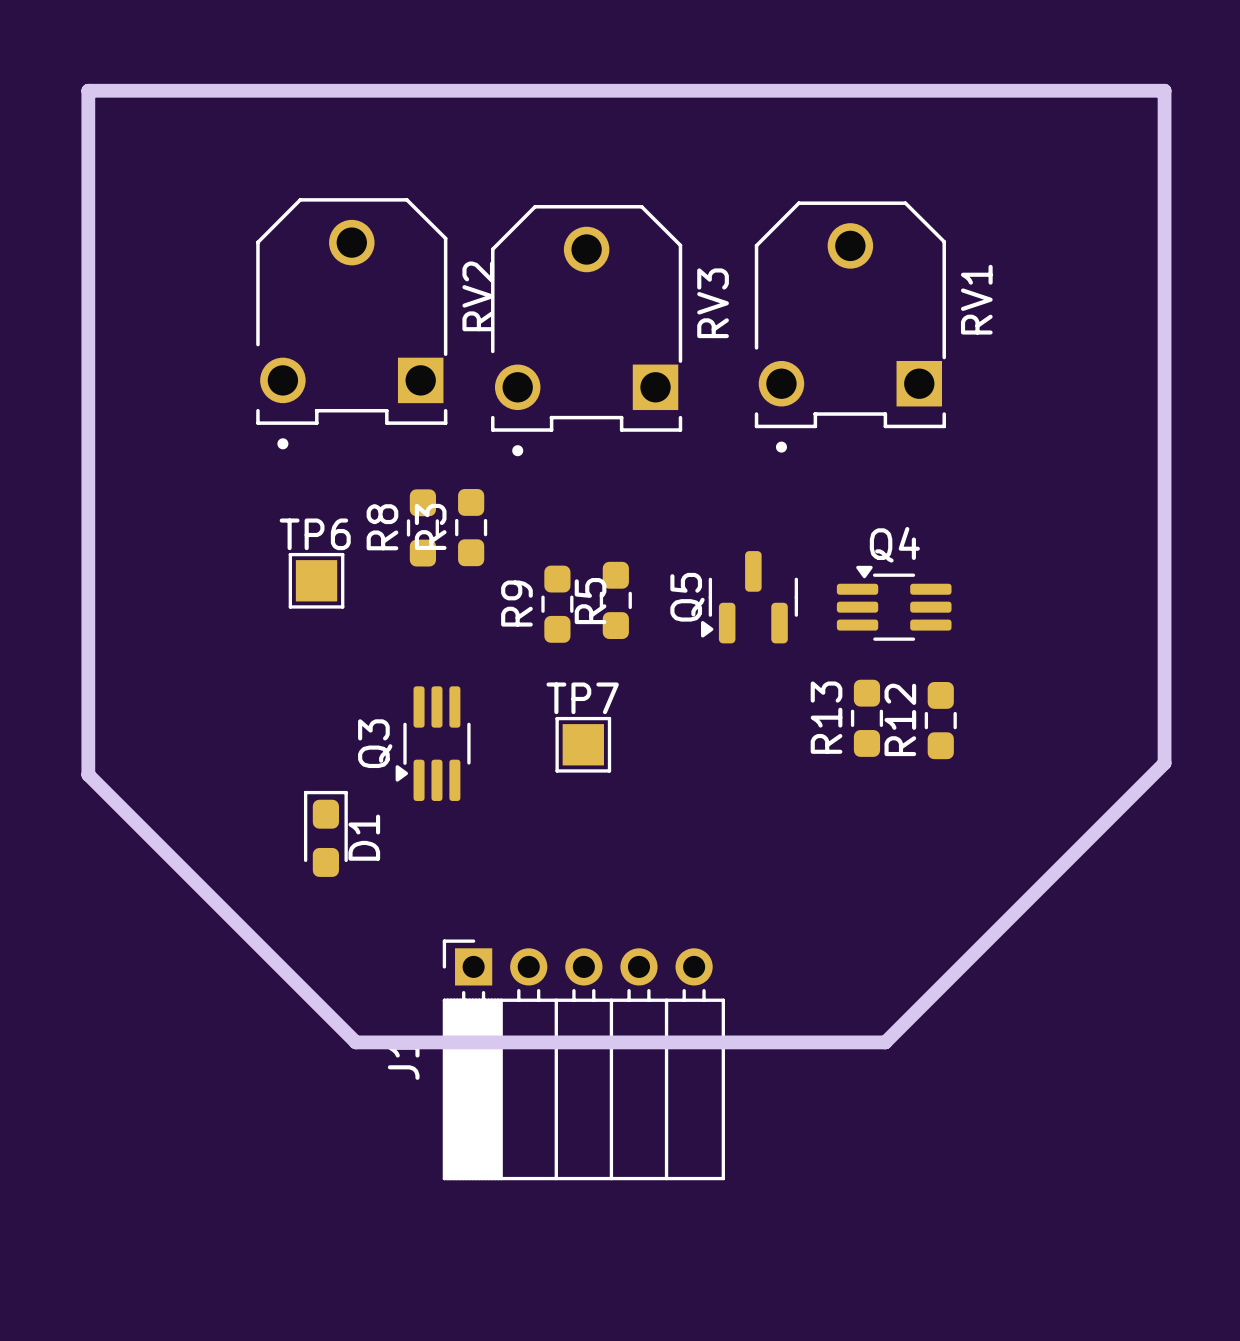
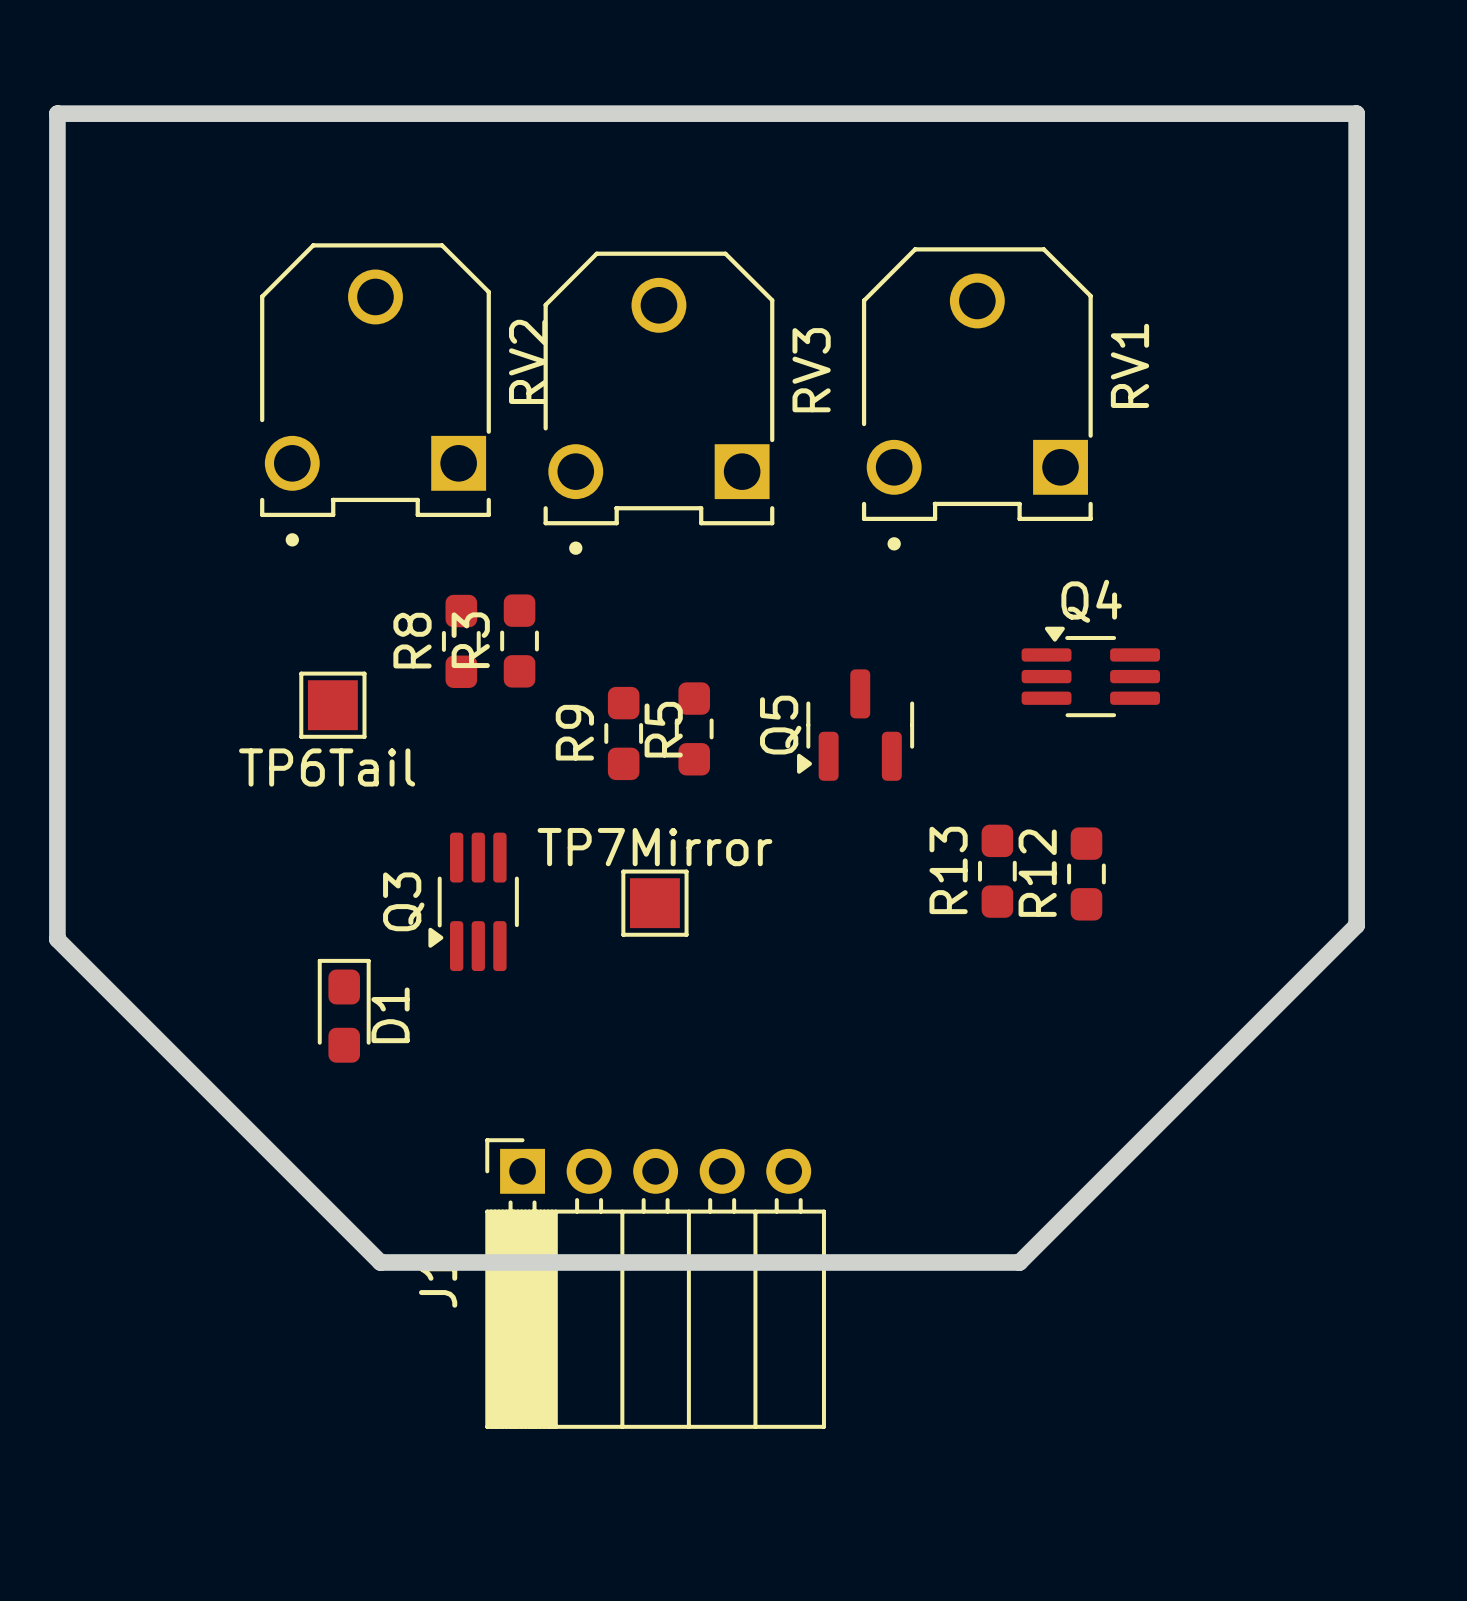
TP6 name: TP6 (315, 534) -> TP6Tail (327, 767)
Q4 position: (894, 603) -> (1090, 671)
TP7 name: TP7 (582, 698) -> TP7Mirror (654, 847)

